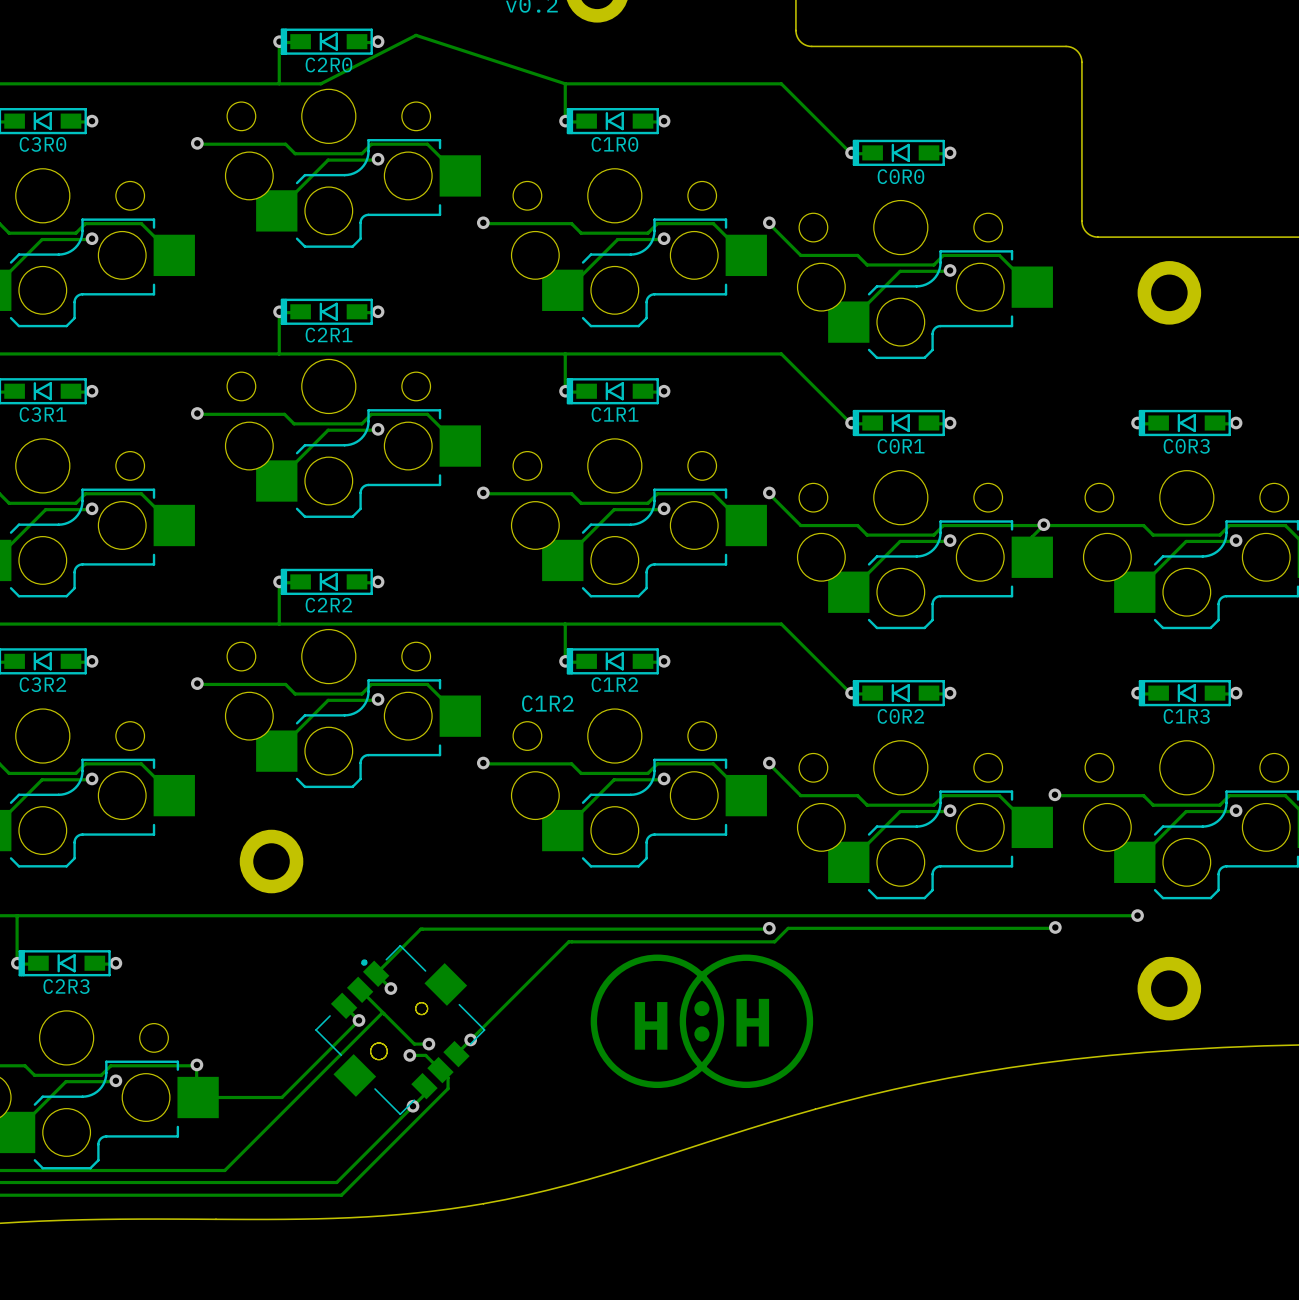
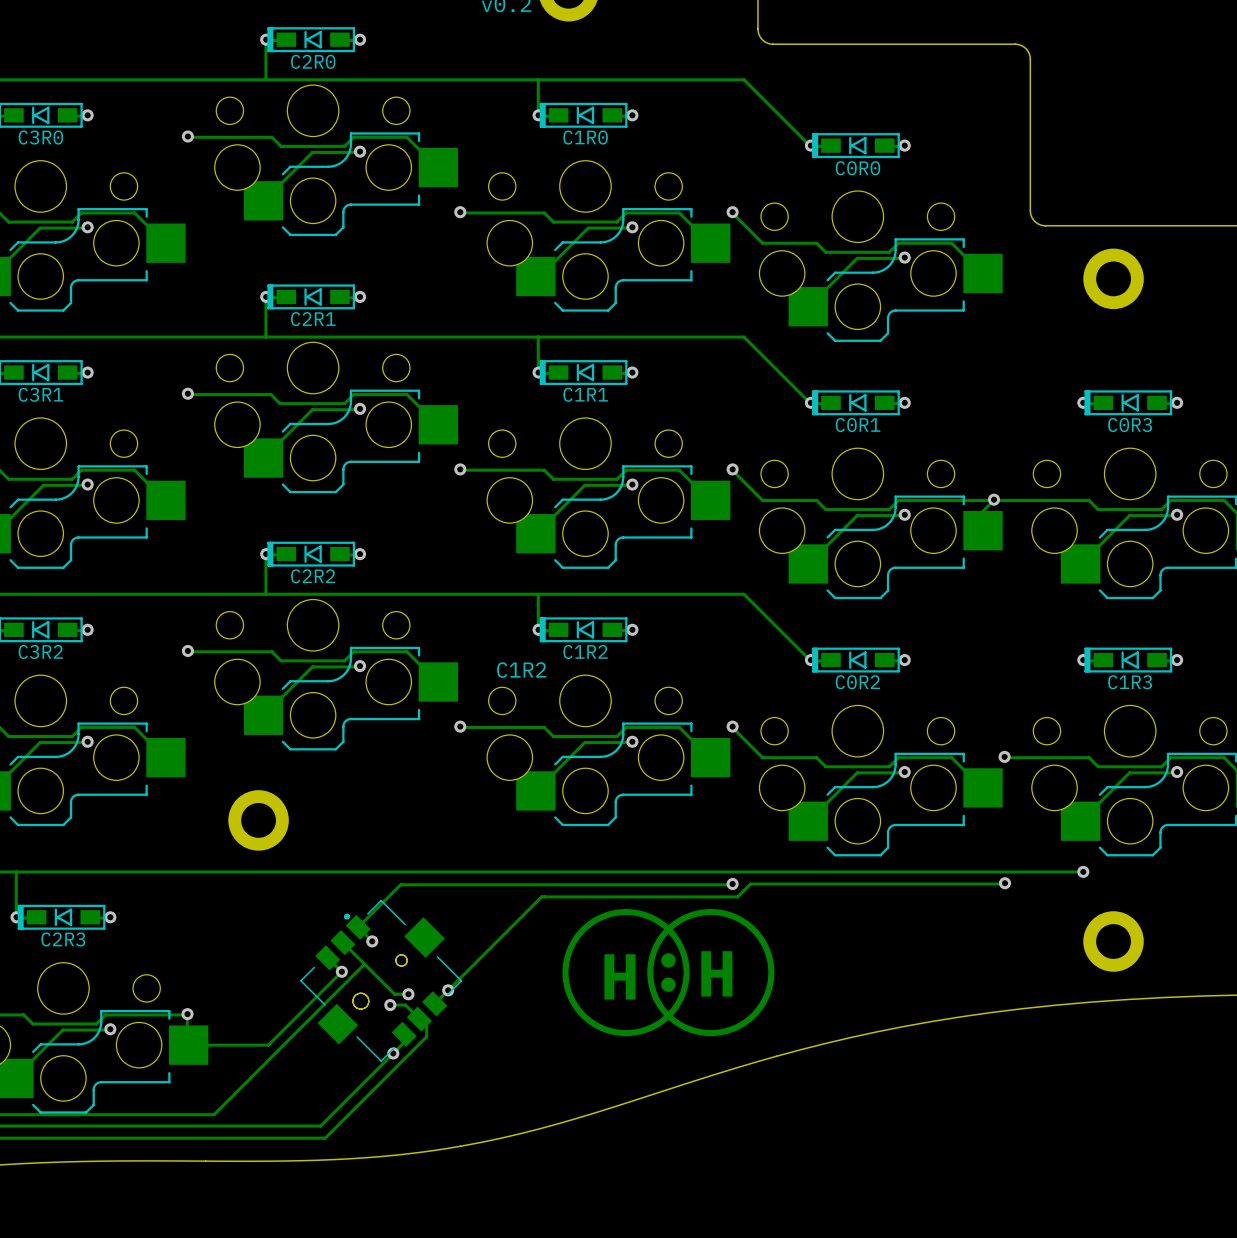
track: (565, 83) (416, 35) (320, 83) -> (538, 79) (305, 79)

